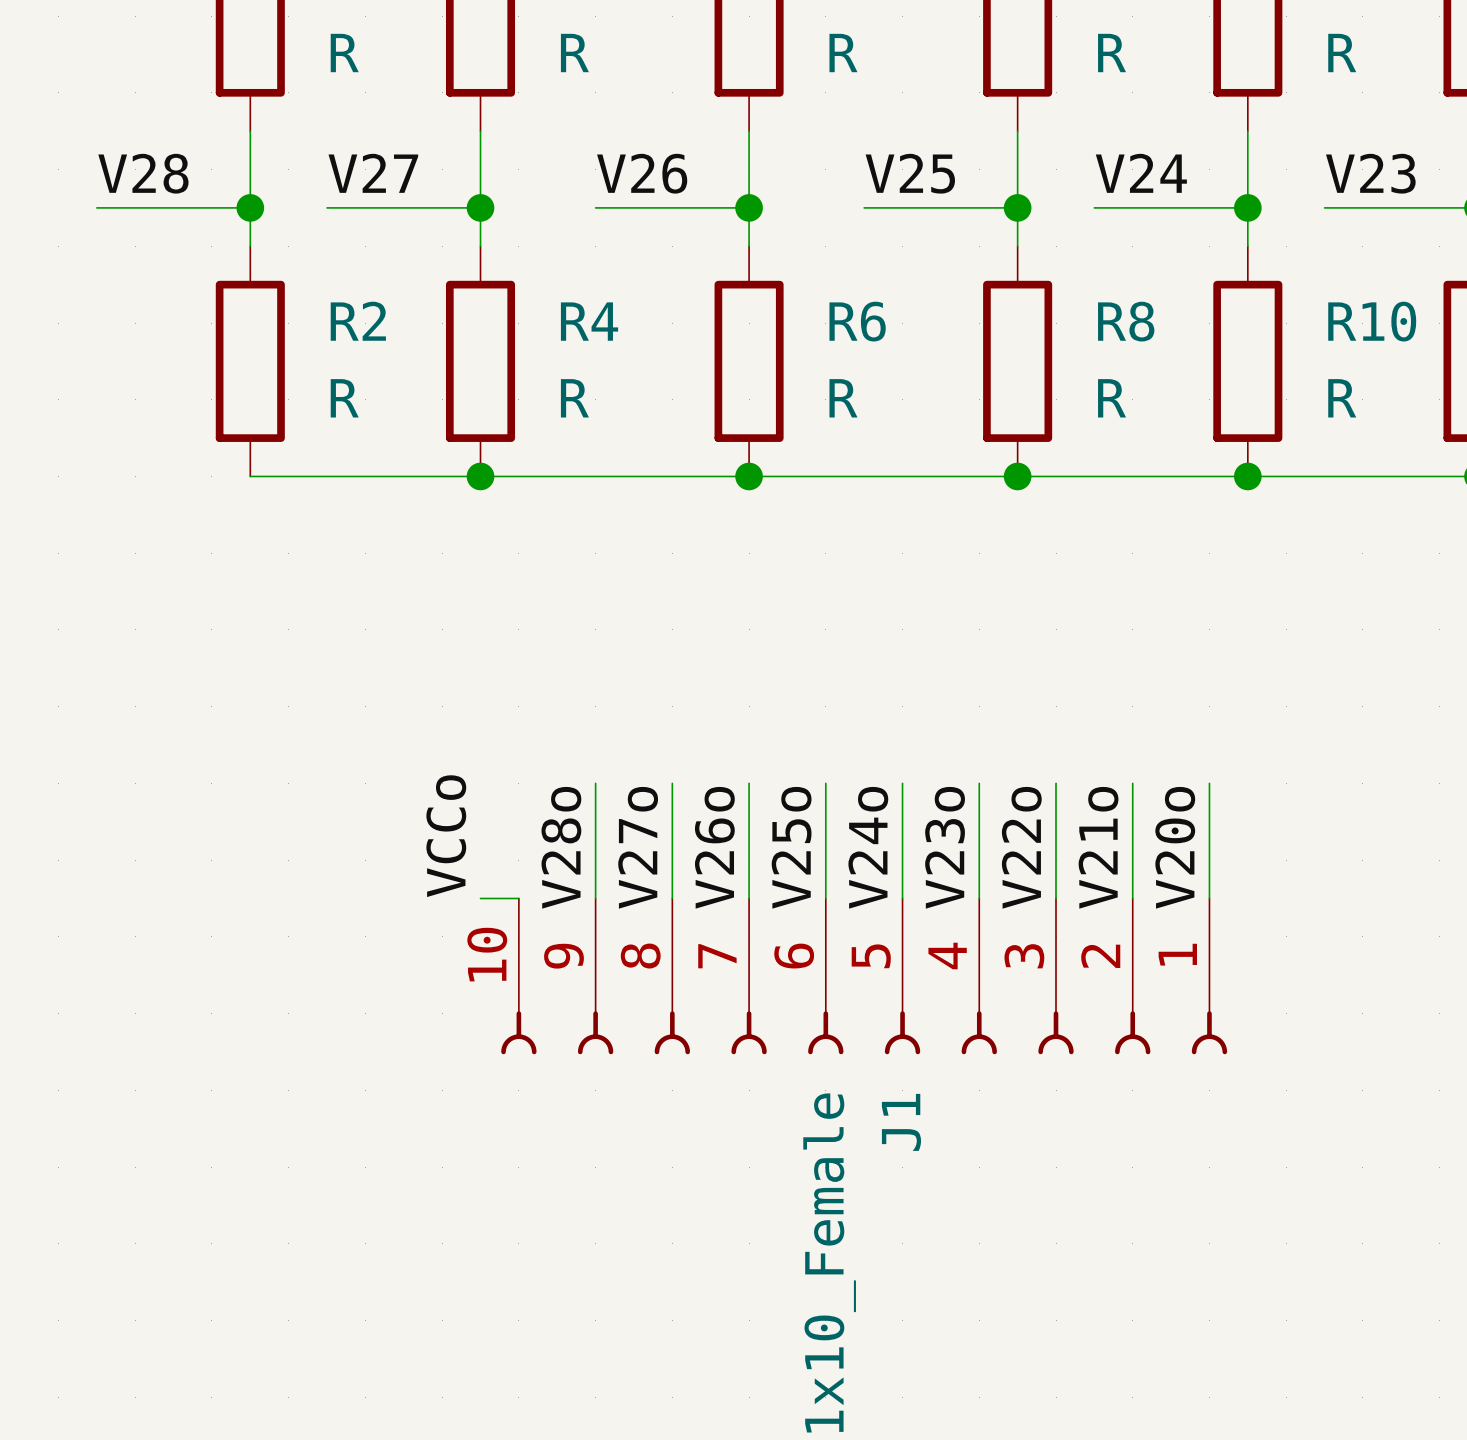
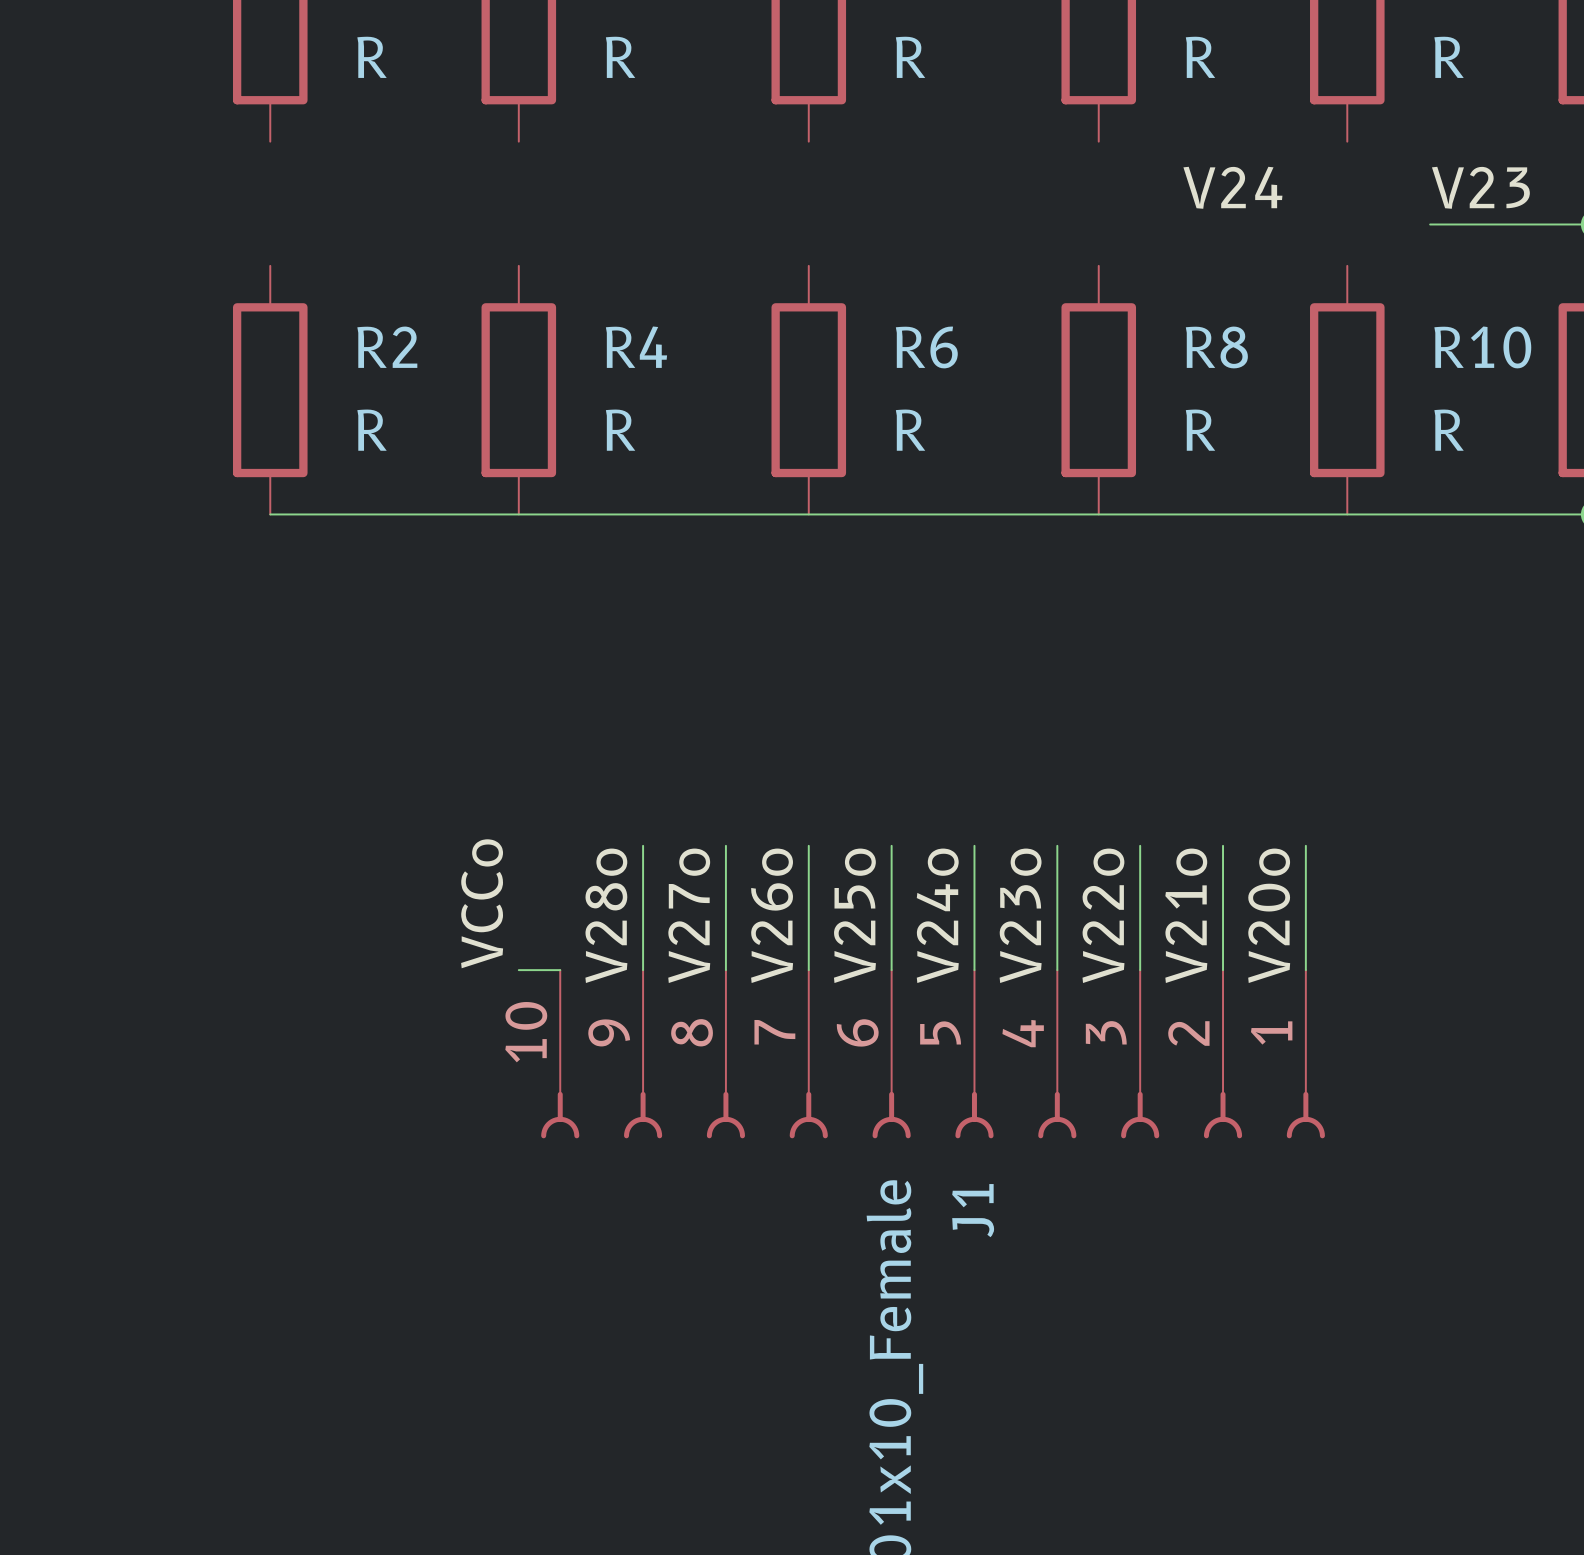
wire: (250, 131) (250, 246) -> none
wire: (480, 131) (480, 246) -> none
wire: (749, 131) (749, 246) -> none
wire: (1017, 131) (1017, 246) -> none
wire: (1247, 131) (1247, 246) -> none
label: V28 (143, 173) -> none
label: V27 (373, 173) -> none
label: V26 (642, 173) -> none
label: V25 (910, 173) -> none
wire: (96, 207) (250, 207) -> none
junction: (250, 207) -> none
wire: (327, 207) (480, 207) -> none
junction: (480, 207) -> none
wire: (595, 207) (749, 207) -> none
junction: (749, 207) -> none
wire: (864, 207) (1017, 207) -> none
junction: (1017, 207) -> none
wire: (1094, 207) (1247, 207) -> none
junction: (1247, 207) -> none
junction: (480, 476) -> none
junction: (749, 476) -> none
junction: (1017, 476) -> none
junction: (1247, 476) -> none

